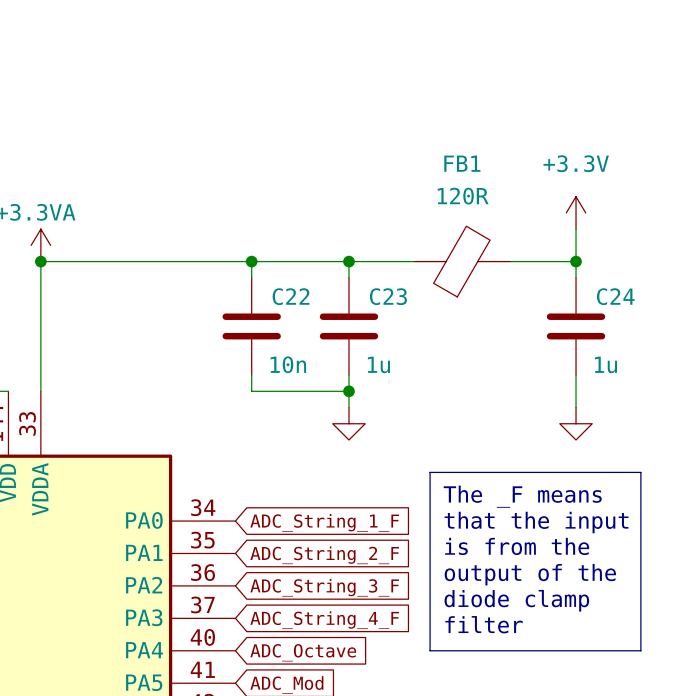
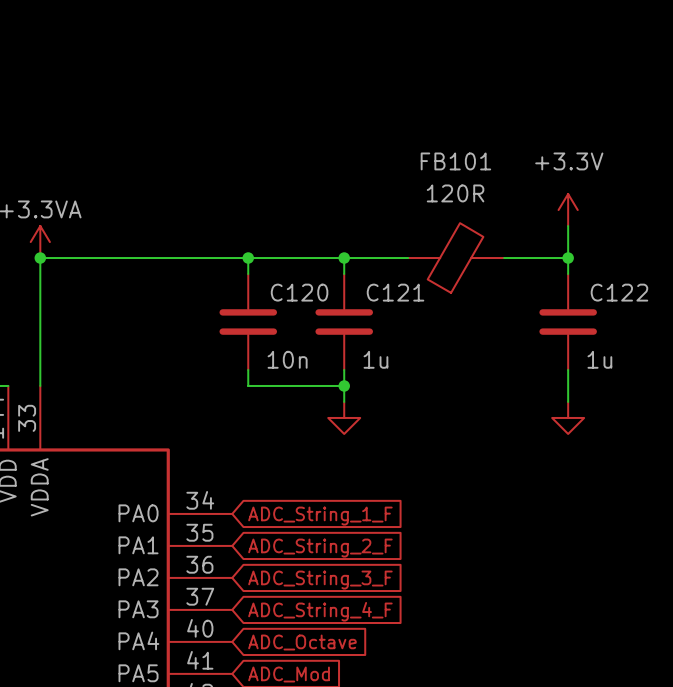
FB1 name: FB1 (462, 163) -> FB101 (455, 161)
C22 name: C22 (291, 296) -> C120 (299, 292)
C23 name: C23 (388, 296) -> C121 (395, 292)
C24 name: C24 (615, 296) -> C122 (619, 292)
line: (430, 472) (640, 472) (640, 650) (430, 650) (430, 472) -> none
text: The _F means (522, 496) -> none
text: that the input (536, 522) -> none
text: is from the (517, 546) -> none
text: output of the (530, 574) -> none
text: diode clamp (516, 600) -> none
text: filter (484, 624) -> none

